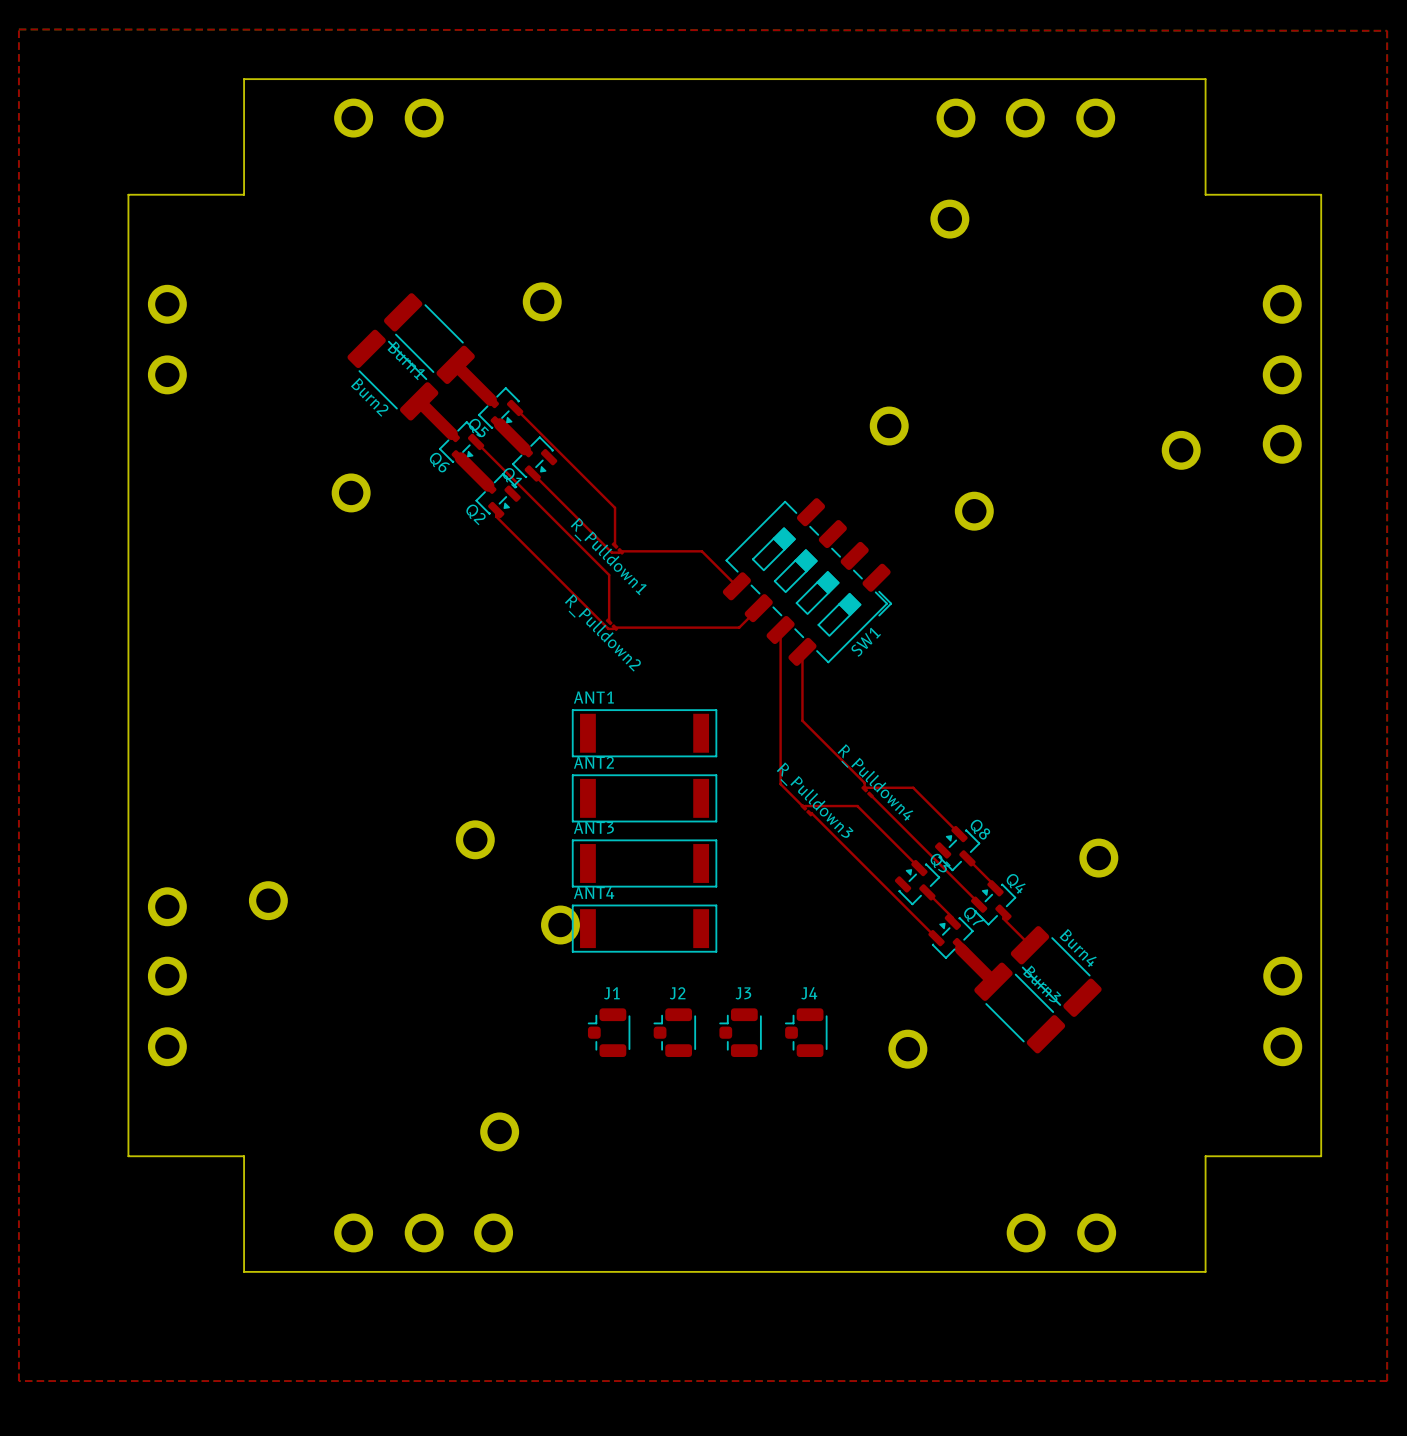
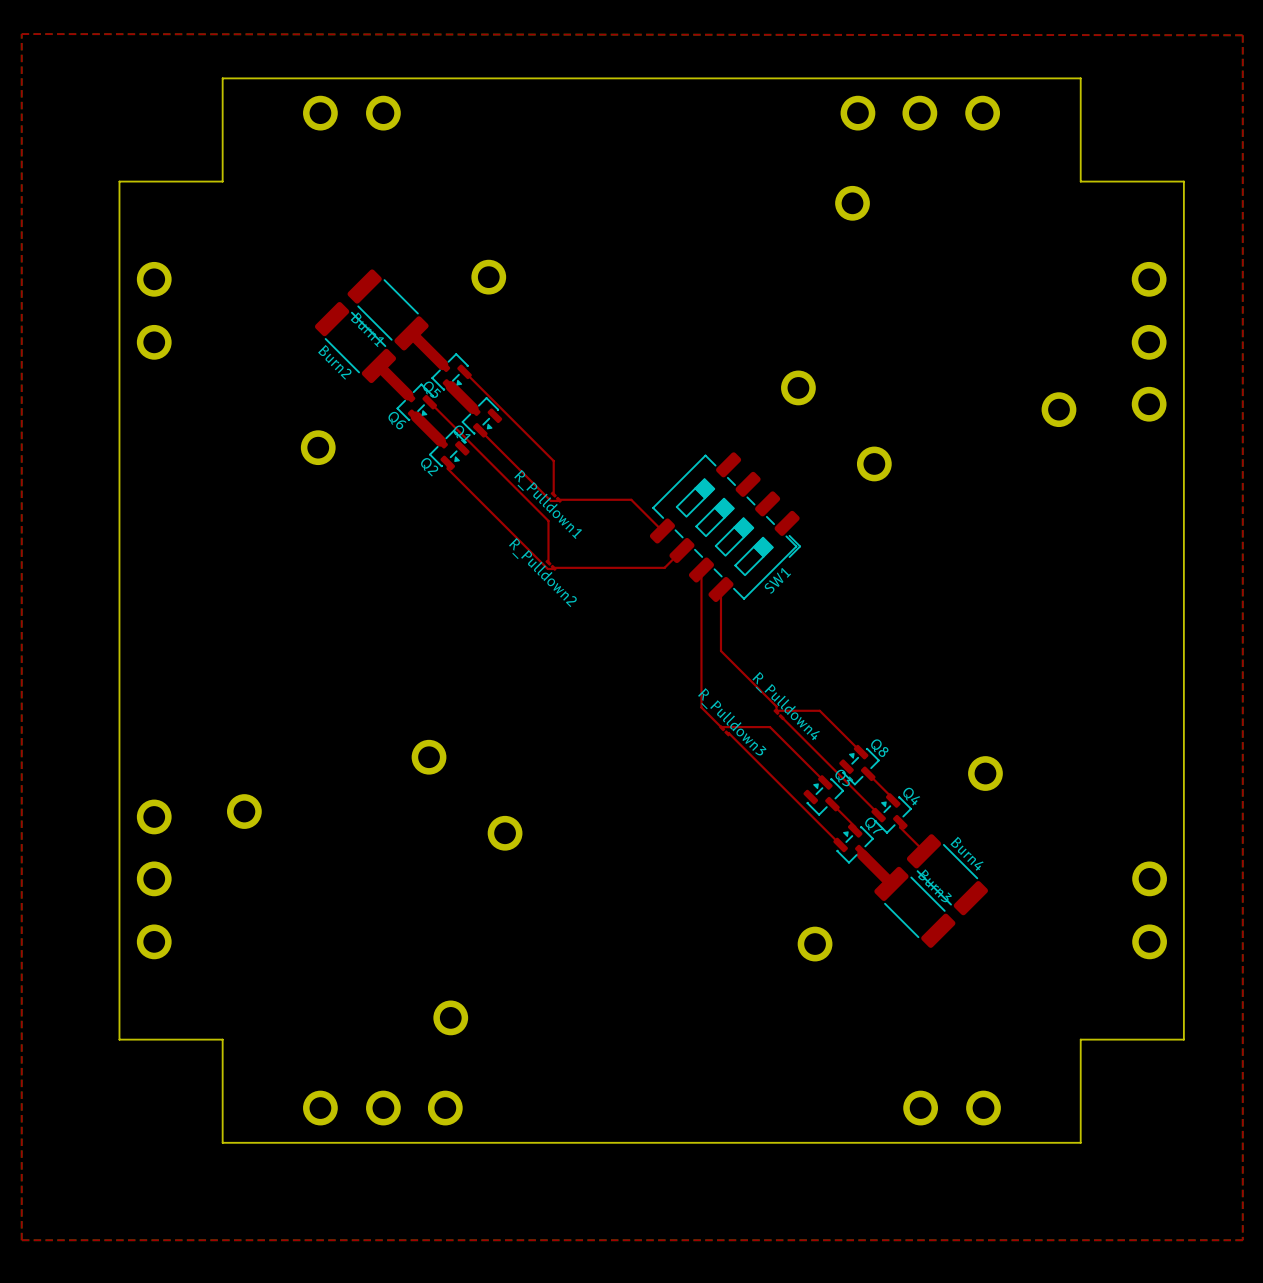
ANT1: (644, 733) -> none
ANT2: (644, 798) -> none
ANT3: (644, 863) -> none
ANT4: (644, 928) -> none
J1: (609, 1032) -> none
J2: (674, 1032) -> none
J3: (740, 1032) -> none
J4: (806, 1032) -> none

